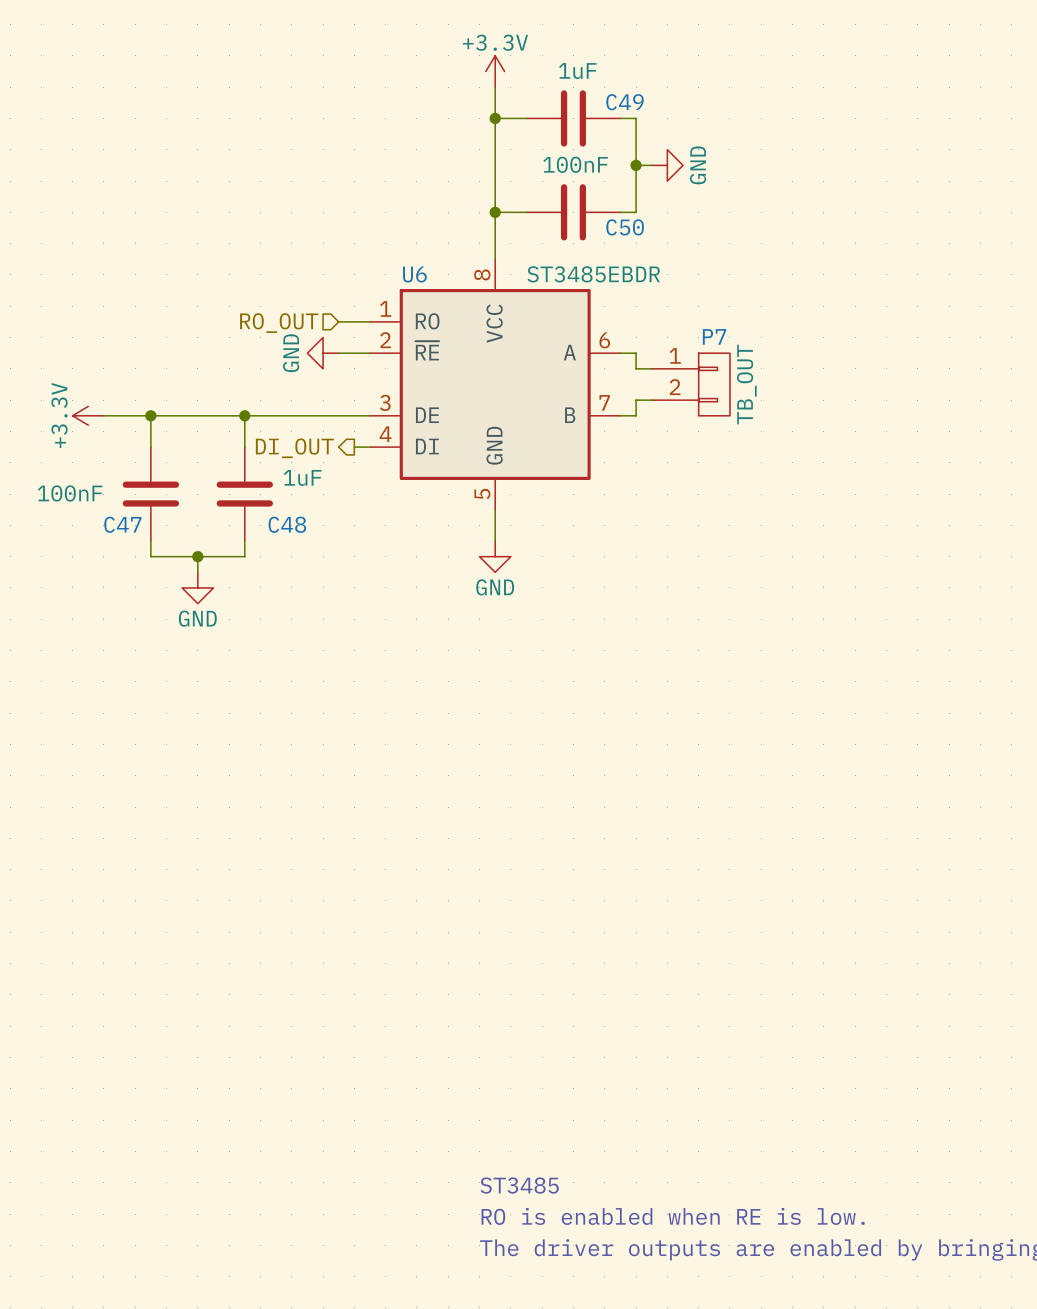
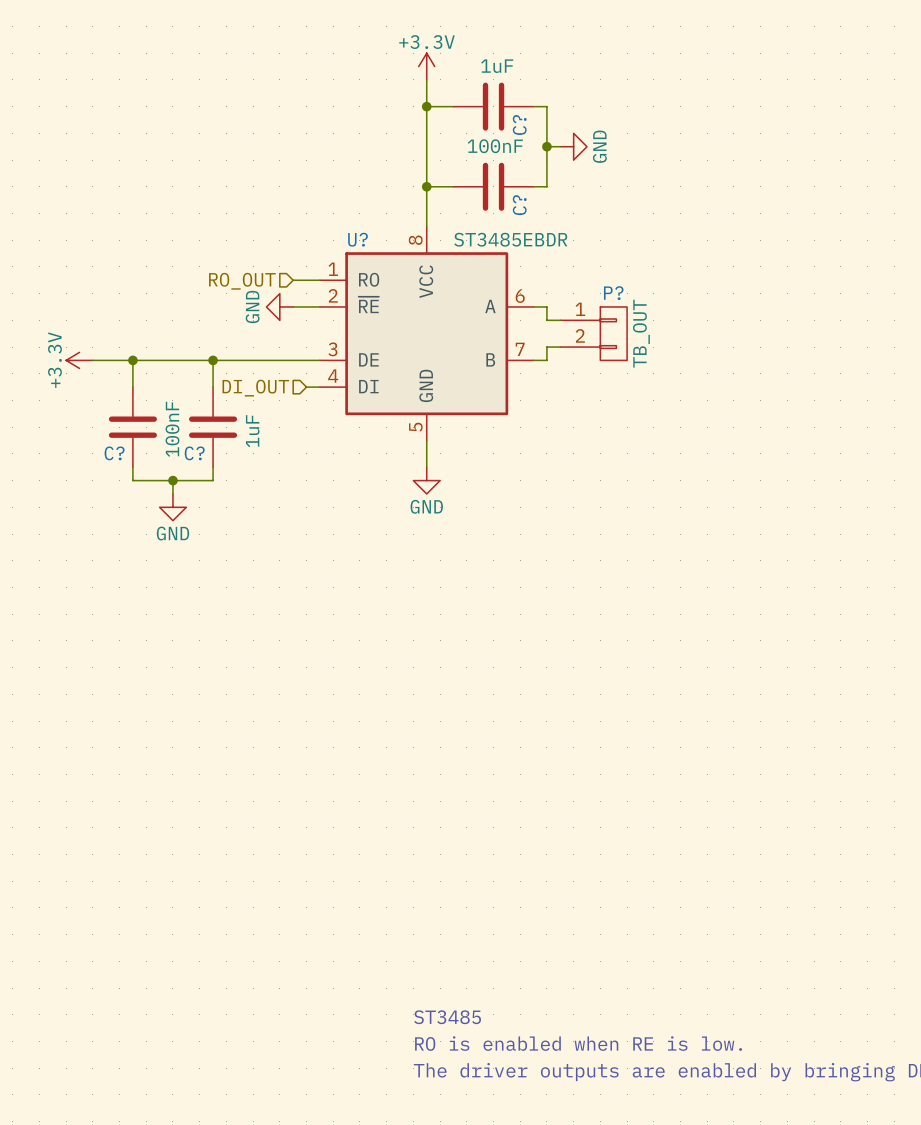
C49 name: C49 (625, 102) -> C? (519, 124)
C50 name: C50 (625, 227) -> C? (519, 205)
U6 name: U6 (414, 274) -> U? (357, 239)
P7 name: P7 (714, 336) -> P? (613, 293)
hierarchical label shape: output (294, 448) -> input (255, 388)
C48 value rotation: 0° (302, 477) -> 90° counterclockwise (252, 431)
C47 value rotation: 0° (70, 493) -> 90° counterclockwise (172, 429)
C47 value position: 100nF (70, 493) -> 100nF (172, 429)
C47 name: C47 (122, 524) -> C? (114, 453)
C48 name: C48 (287, 524) -> C? (194, 453)

